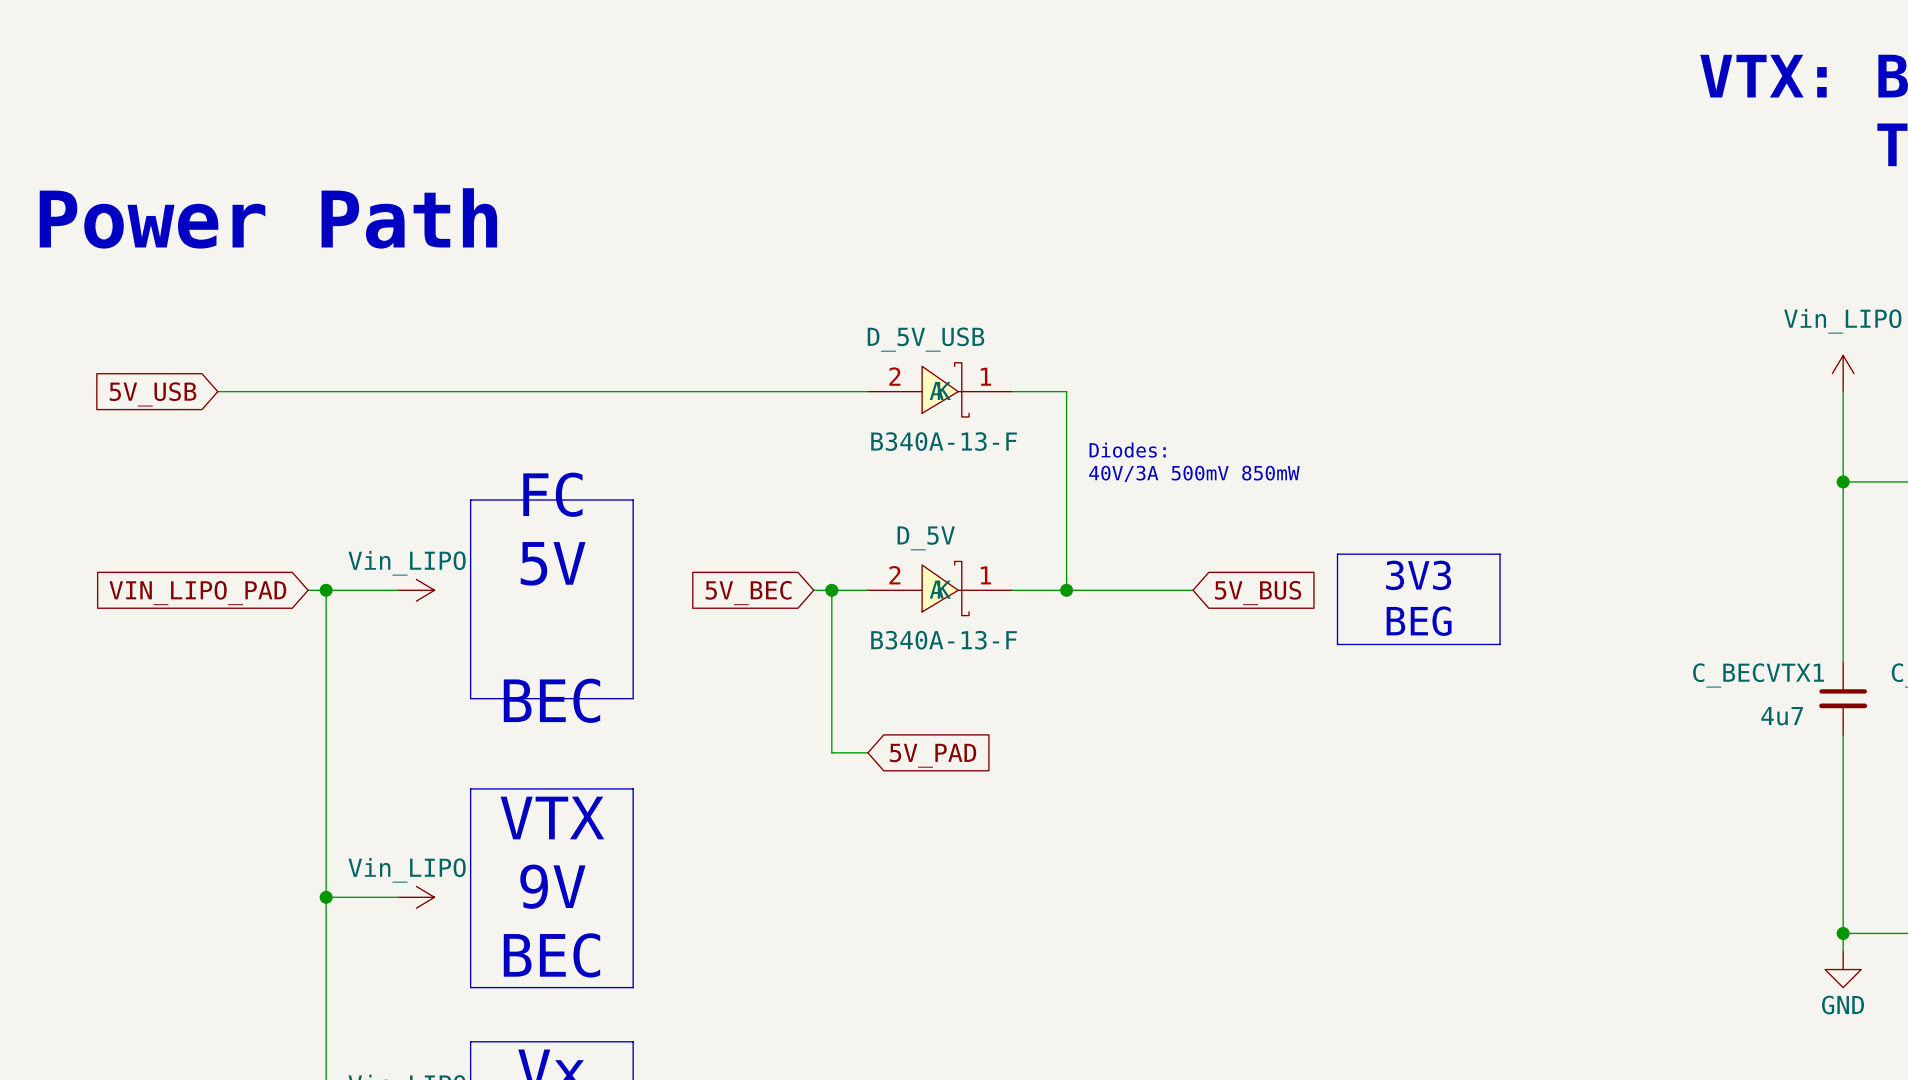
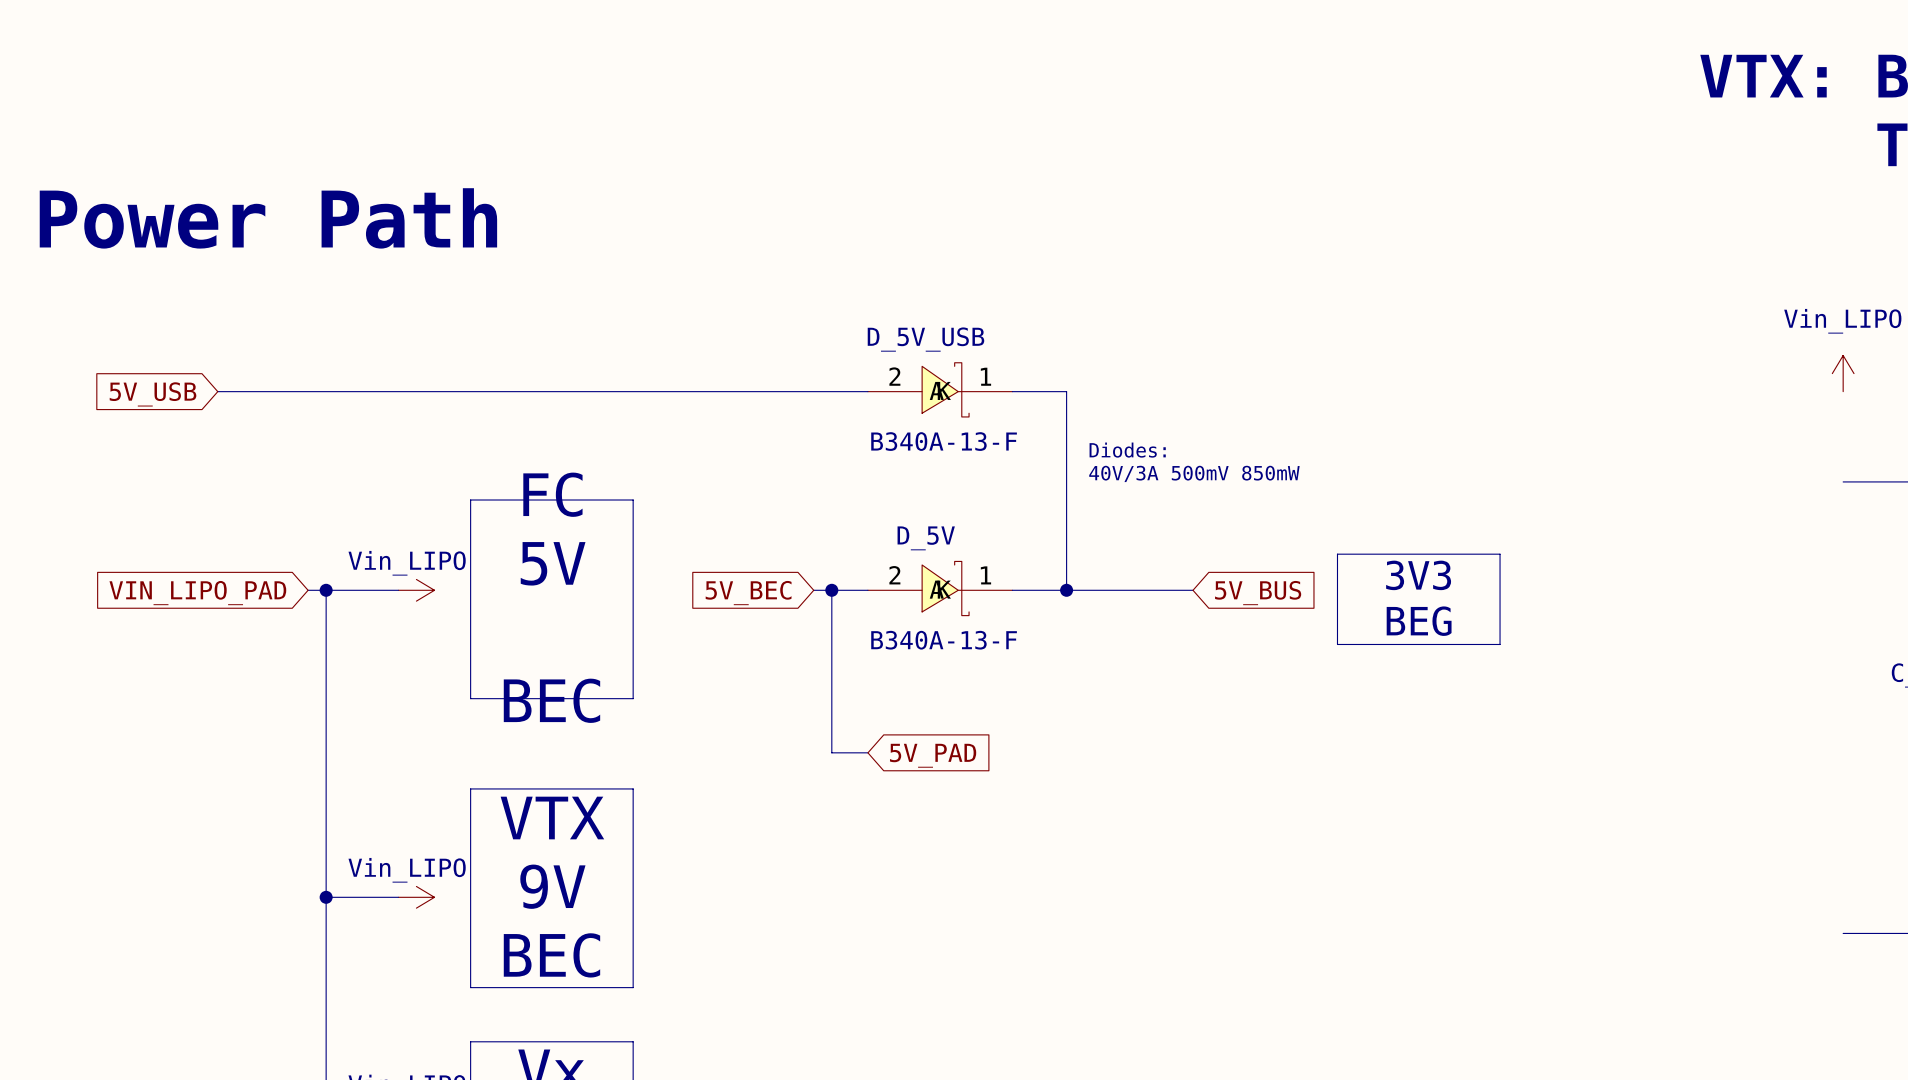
wire: (1843, 391) (1843, 662) -> none
junction: (1843, 481) -> none
C_BECVTX1: 4u7 (1843, 698) -> none
wire: (1843, 734) (1843, 951) -> none
junction: (1843, 933) -> none
power symbol: GND (1843, 969) -> none

